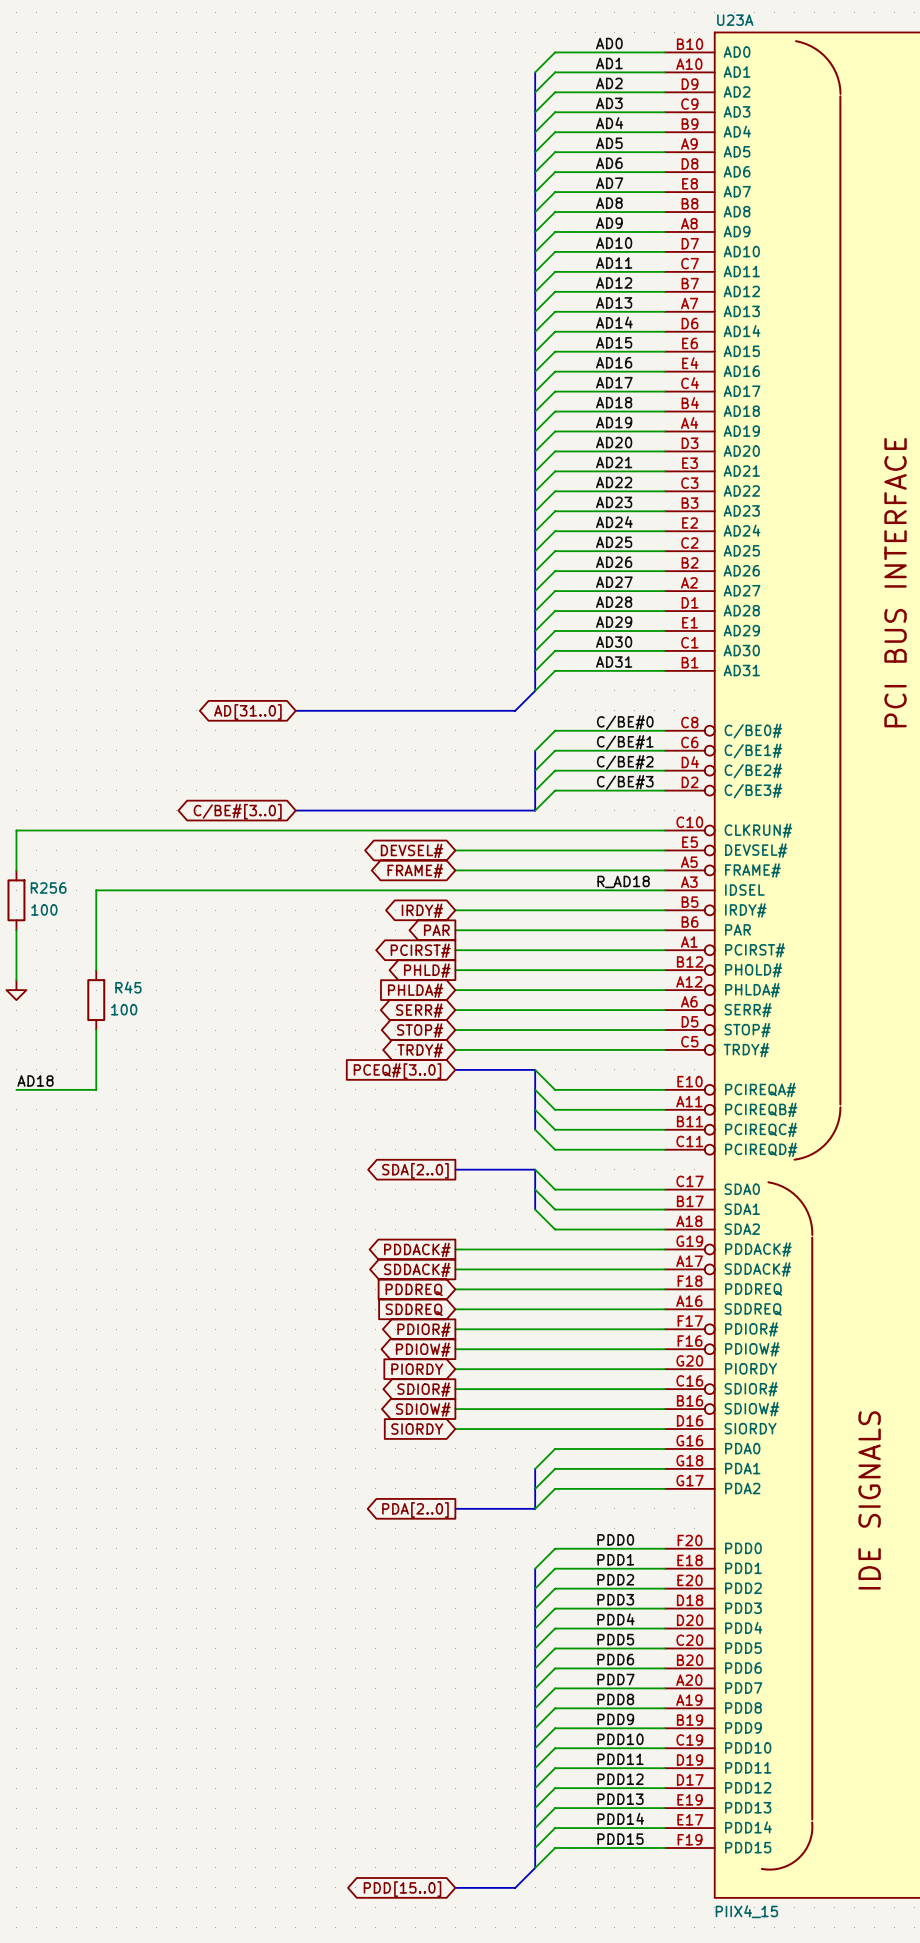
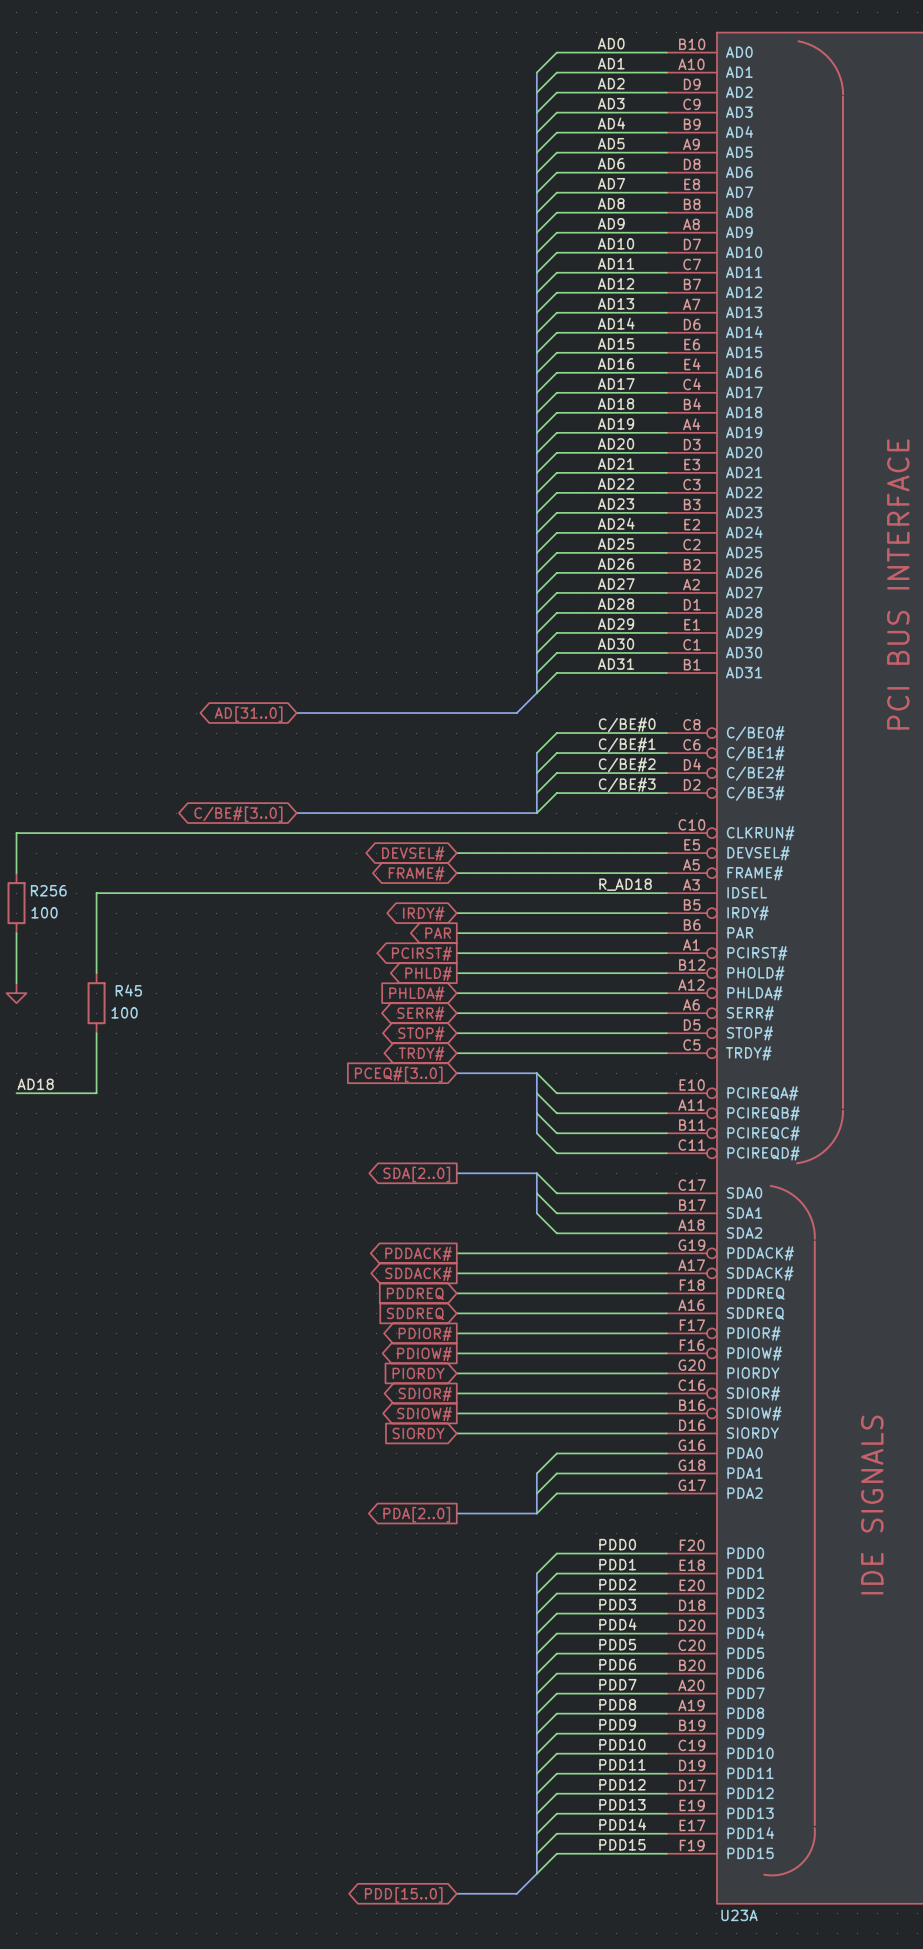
U23A name position: U23A (735, 20) -> U23A (739, 1915)
U23A text: PIIX4_15 (746, 1911) -> none

